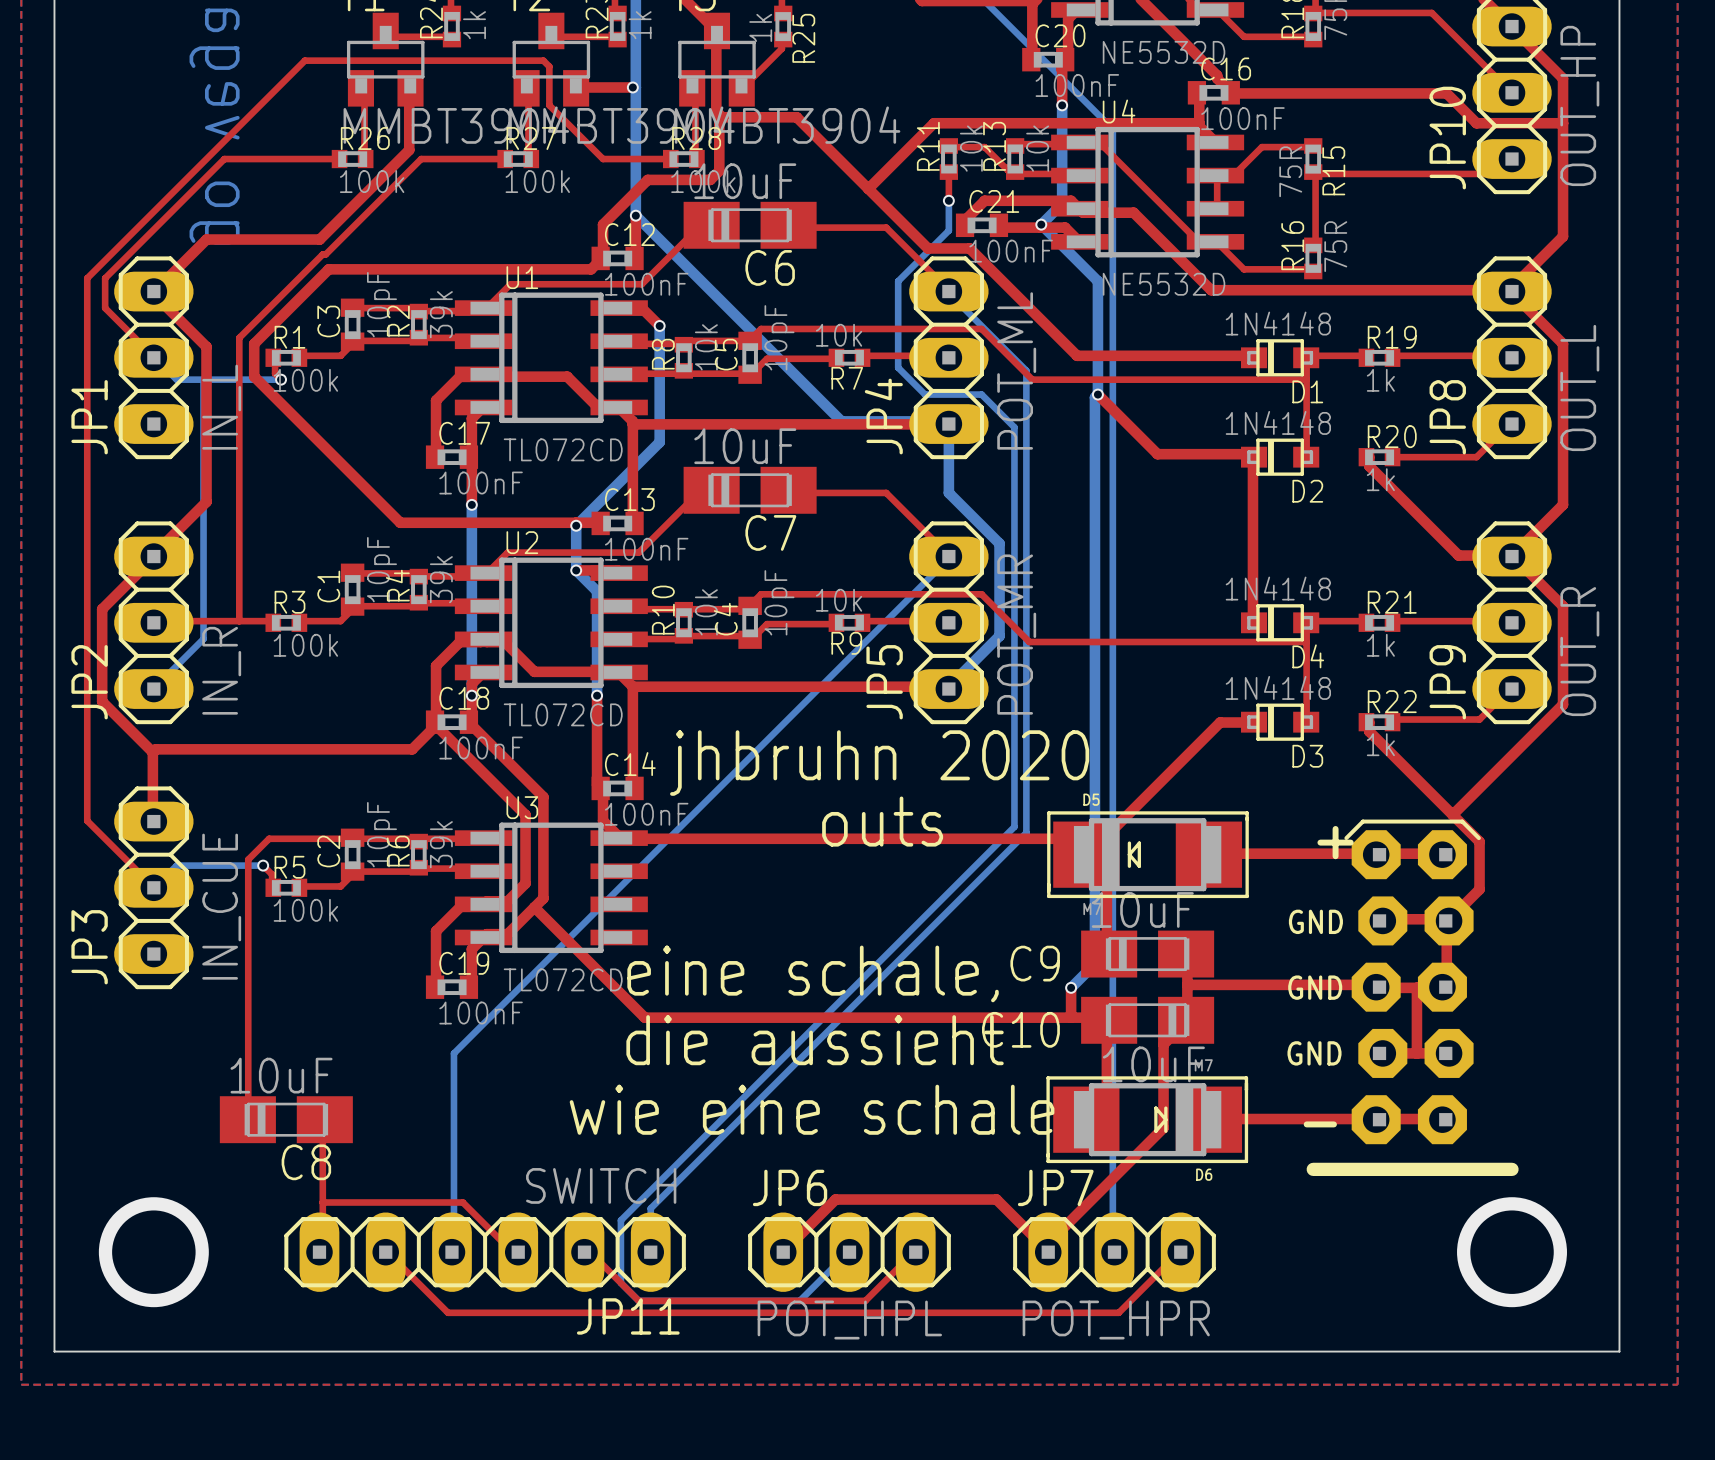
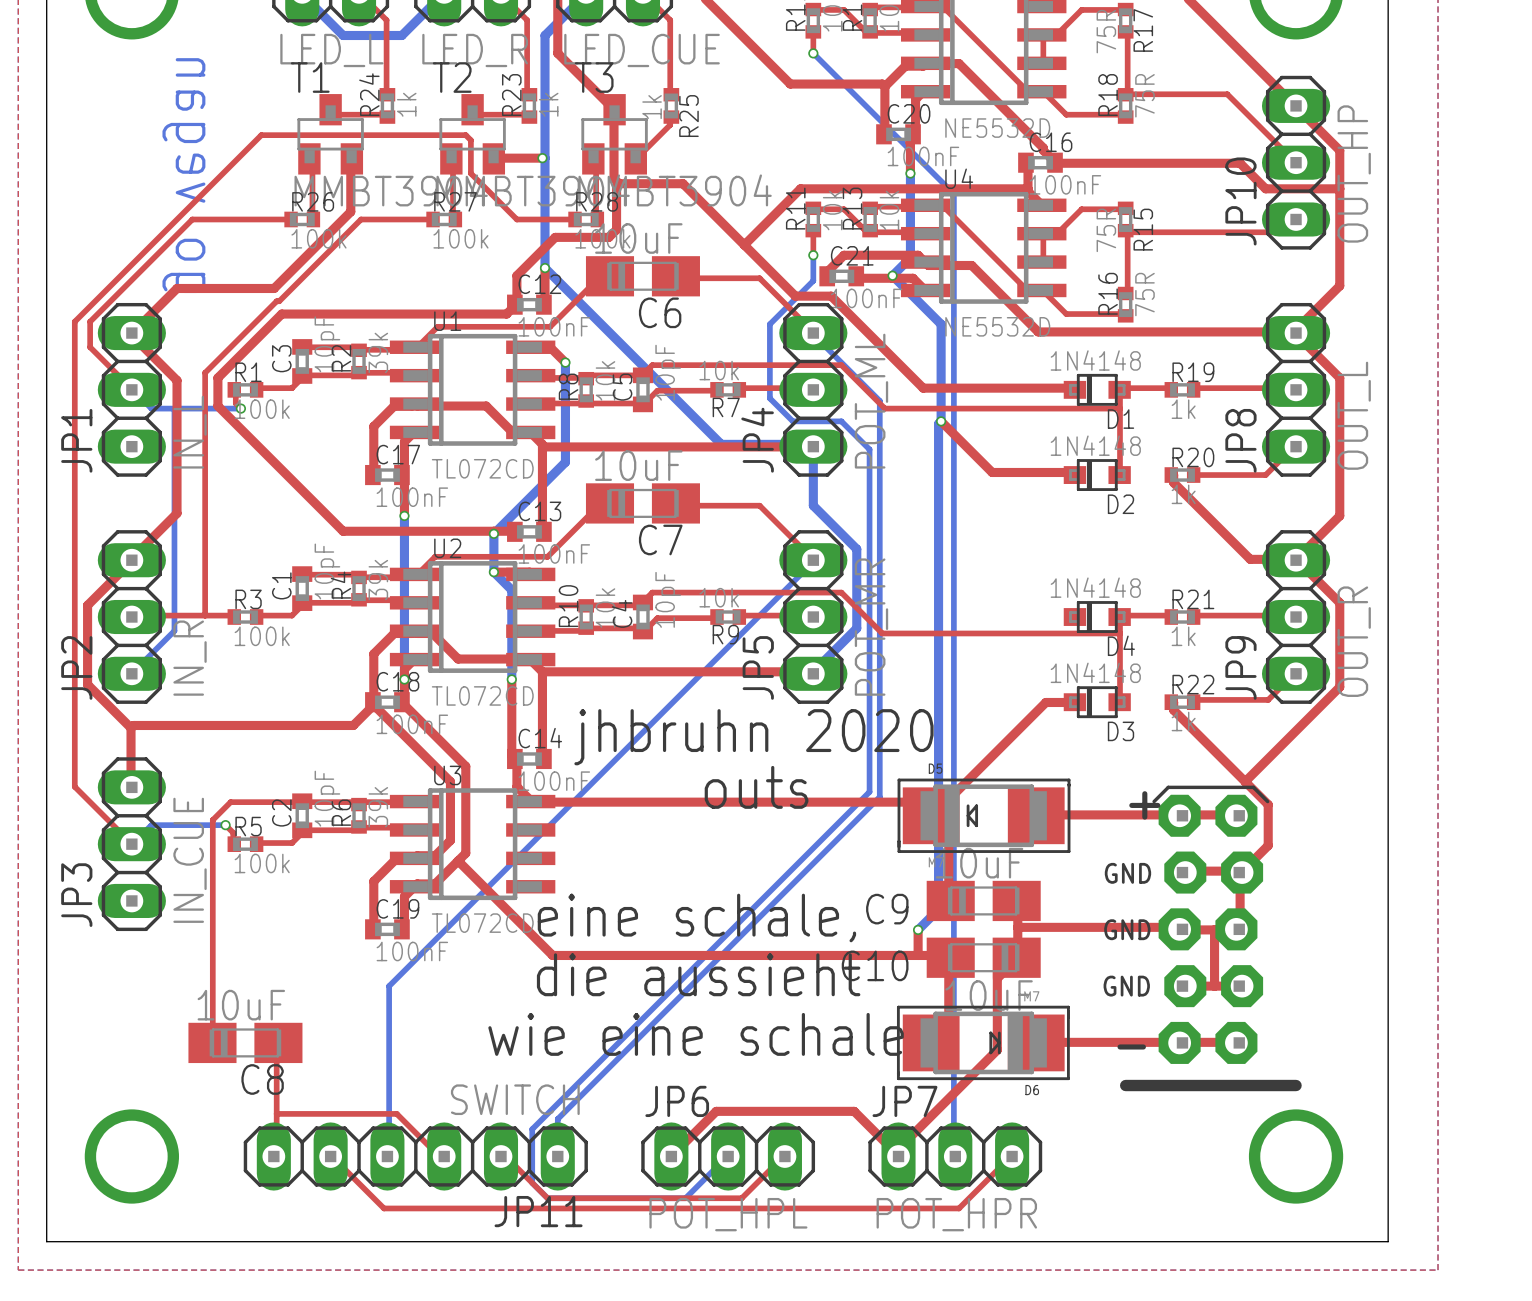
top track: (1249, 454) (1254, 457) (1254, 622) -> none

